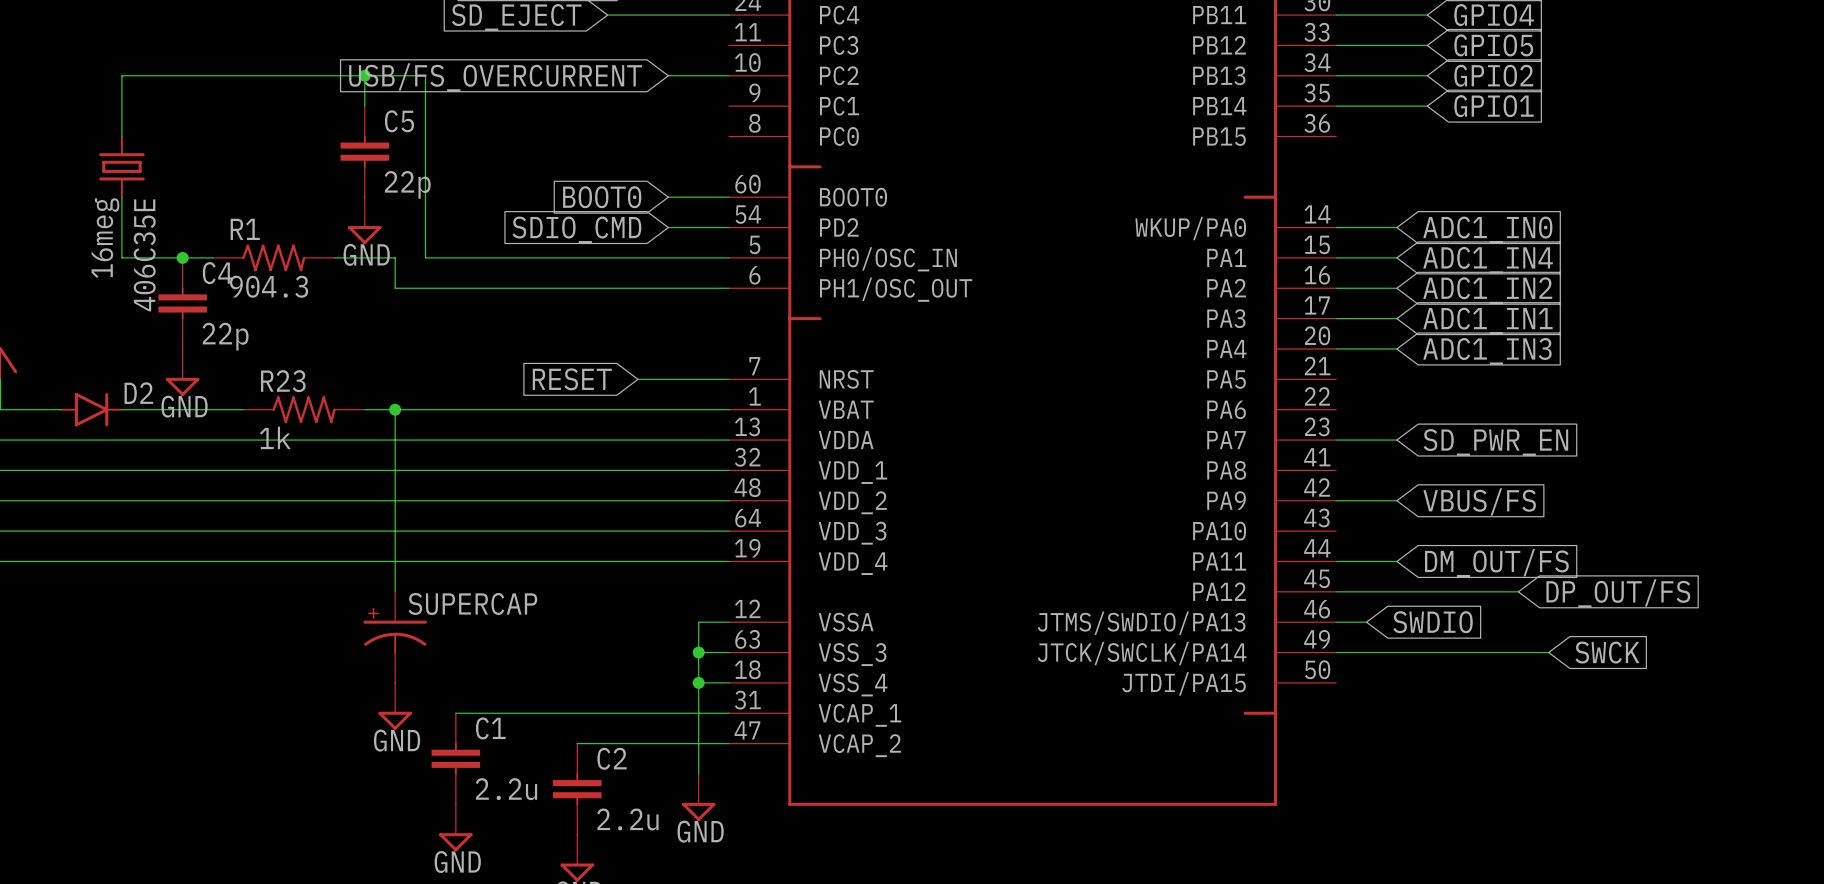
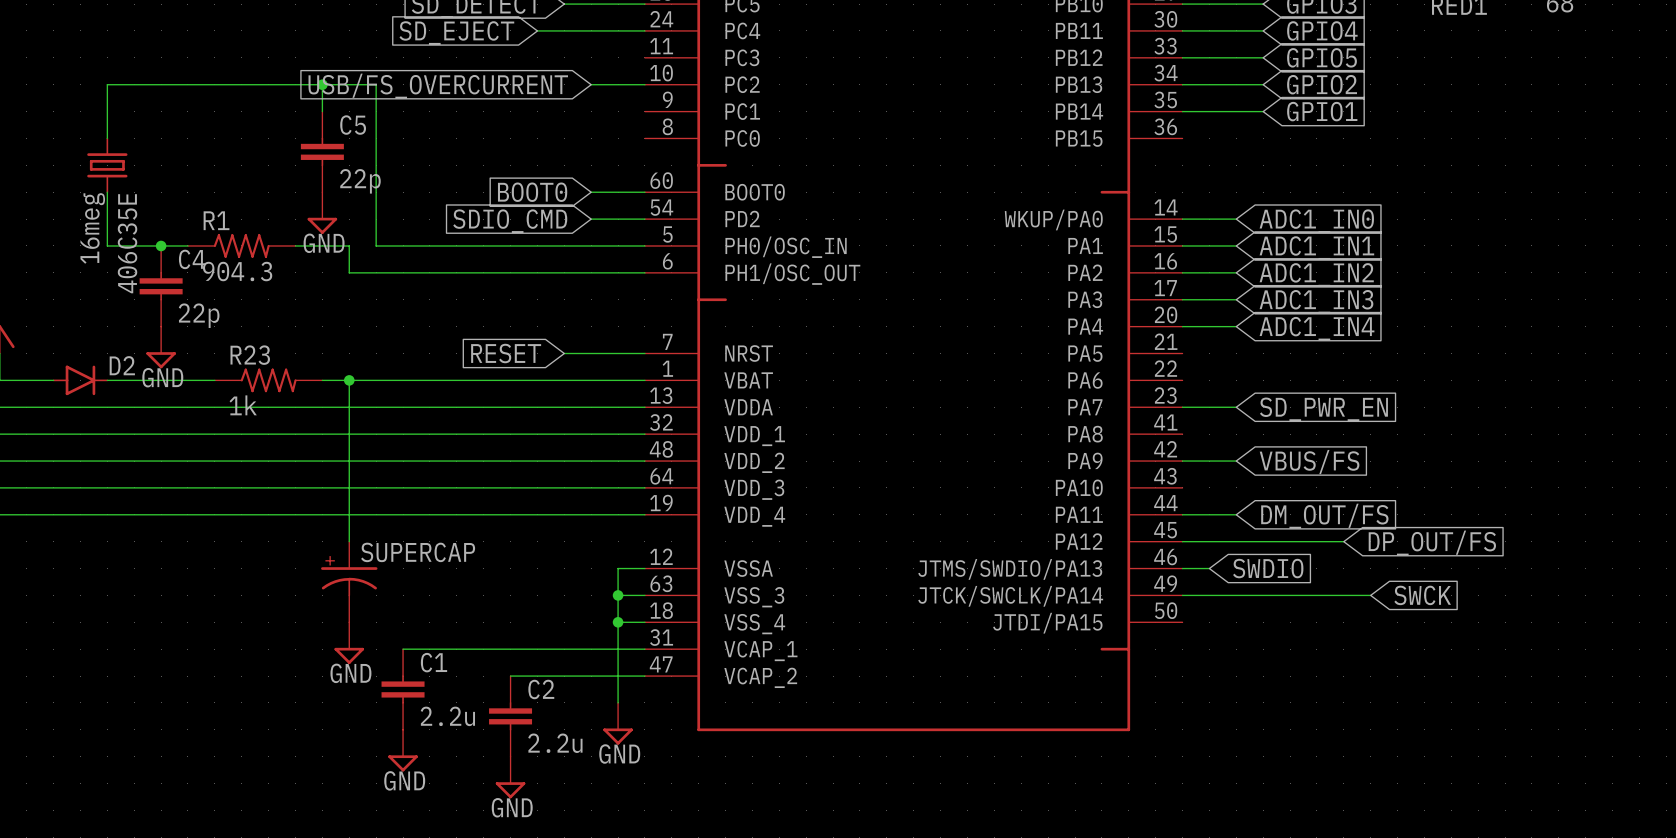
global label: ADC1_IN4 (1488, 260) -> ADC1_IN1 (1316, 248)
global label: ADC1_IN1 (1487, 321) -> ADC1_IN3 (1316, 301)
global label: ADC1_IN3 (1487, 351) -> ADC1_IN4 (1317, 328)

